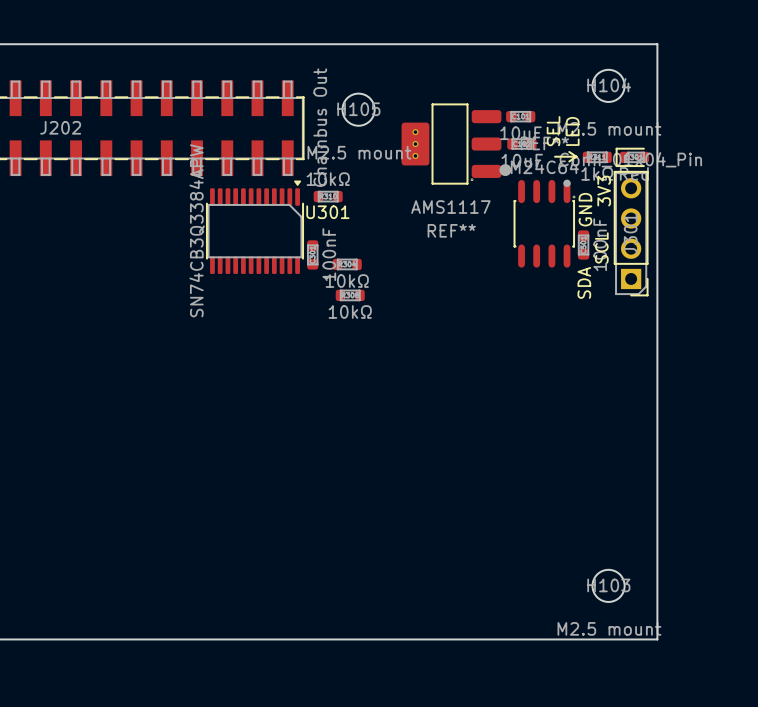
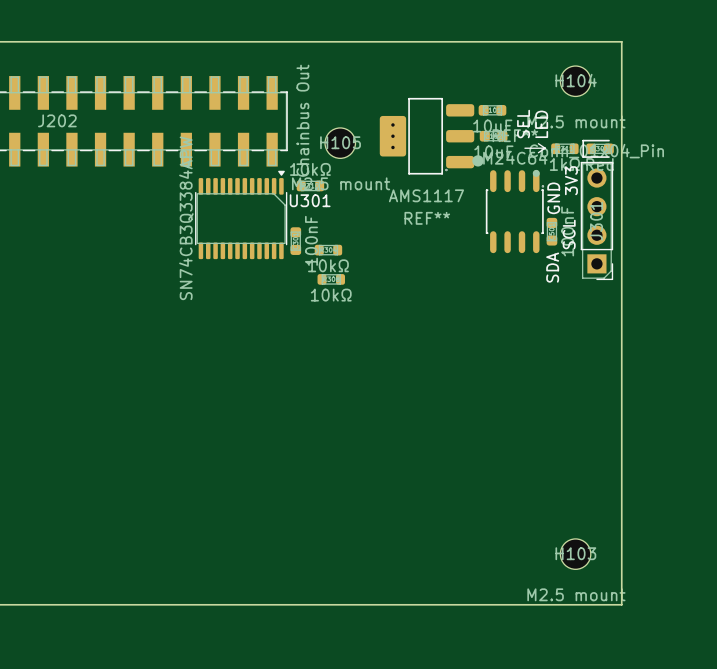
H105 position: (358, 109) -> (340, 143)

